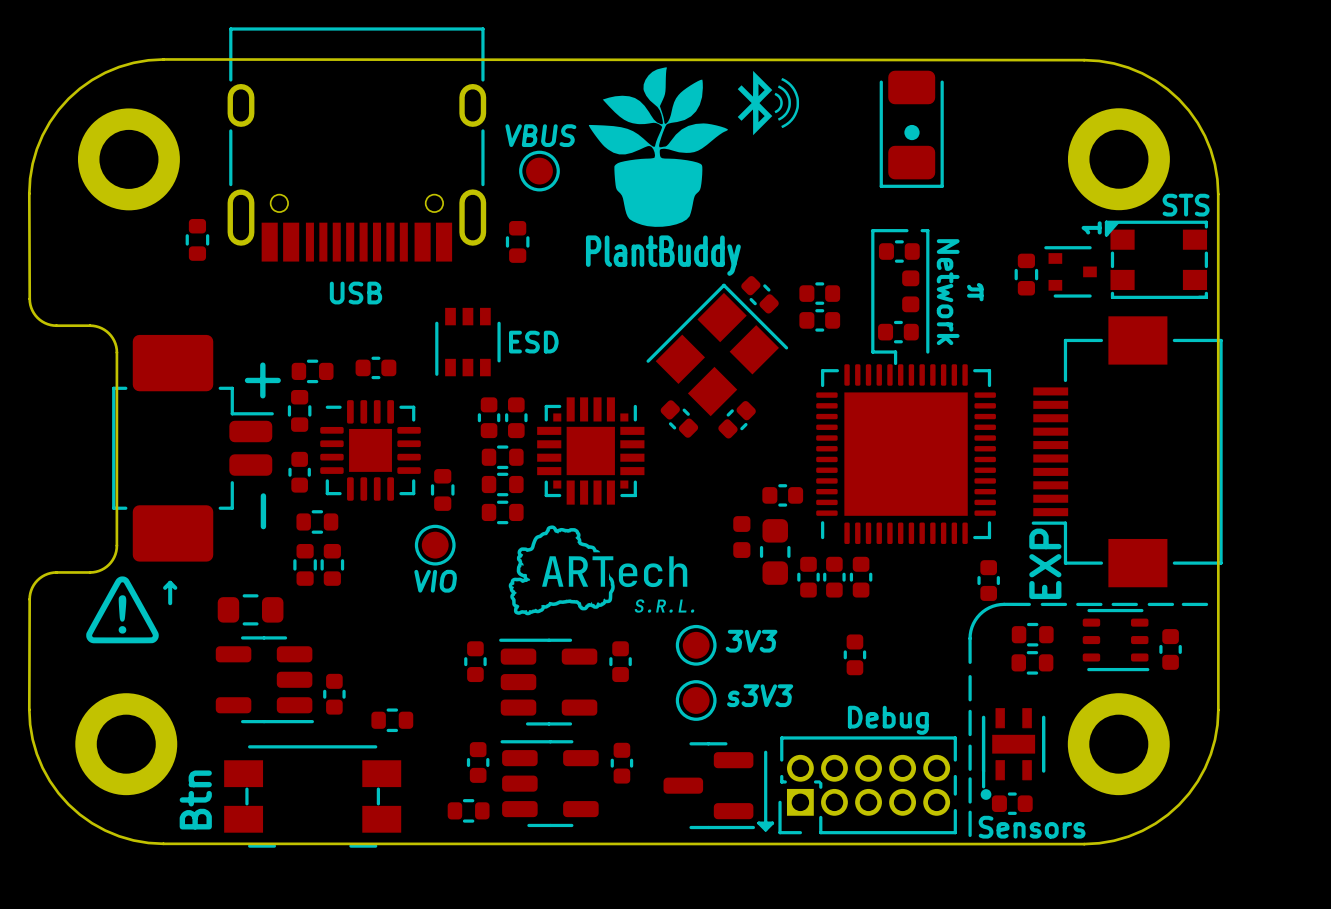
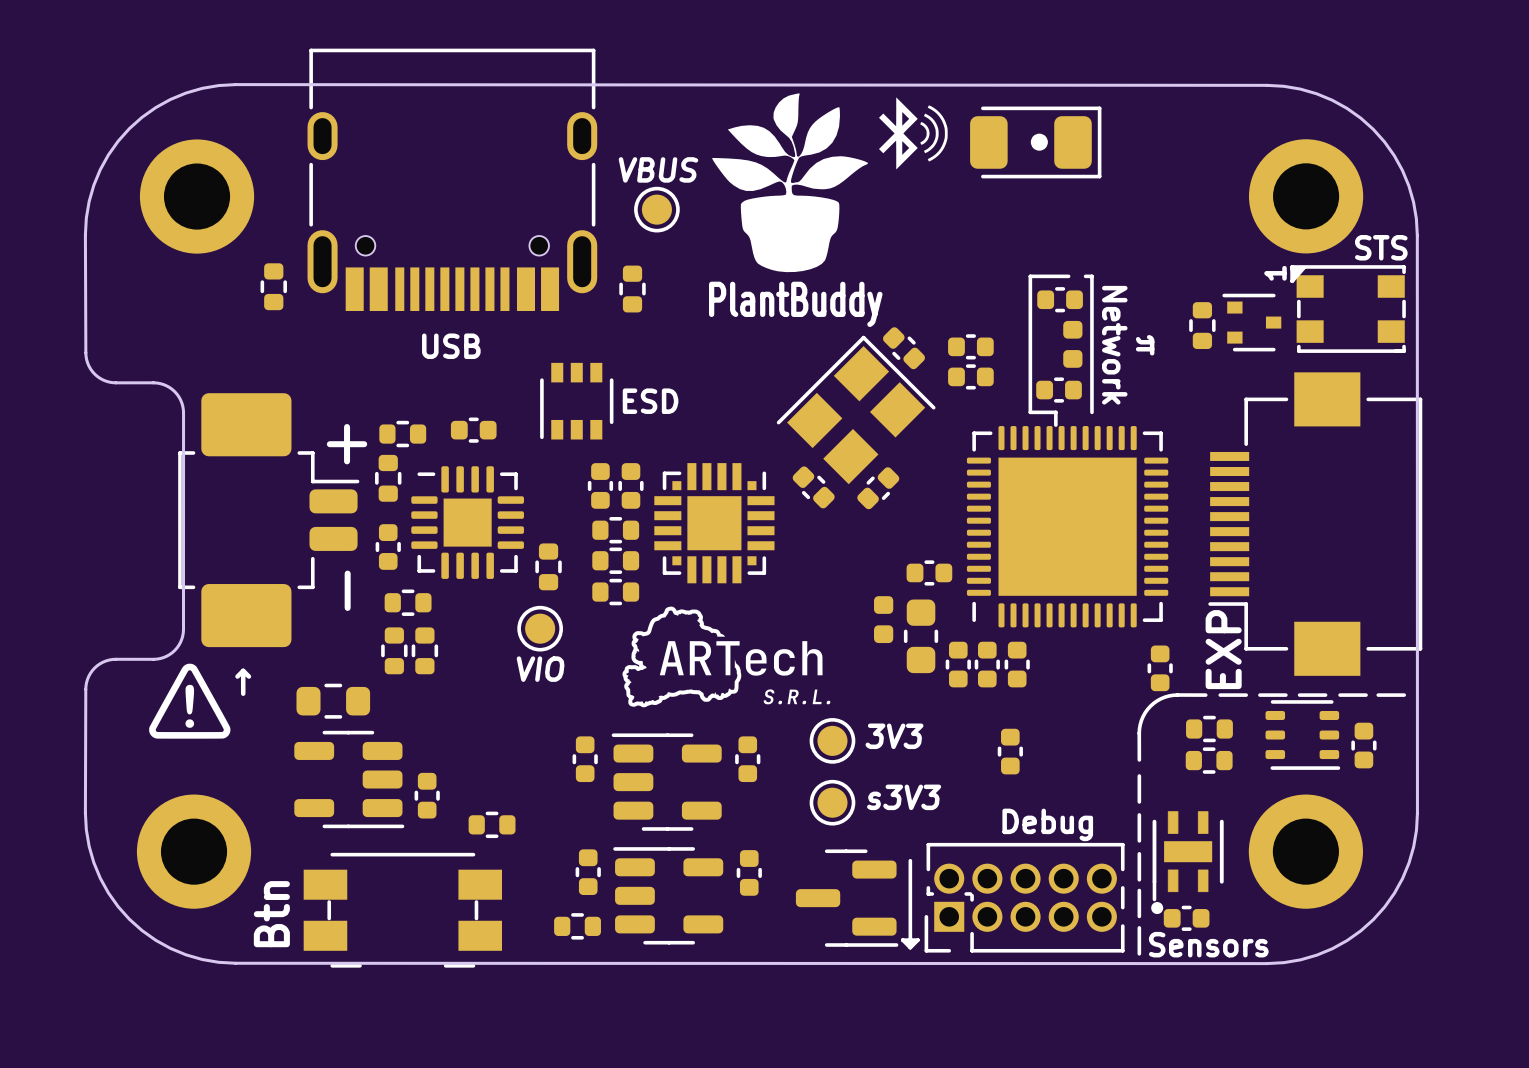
part rotation: 0° (911, 129) -> 90° counterclockwise (1035, 142)

